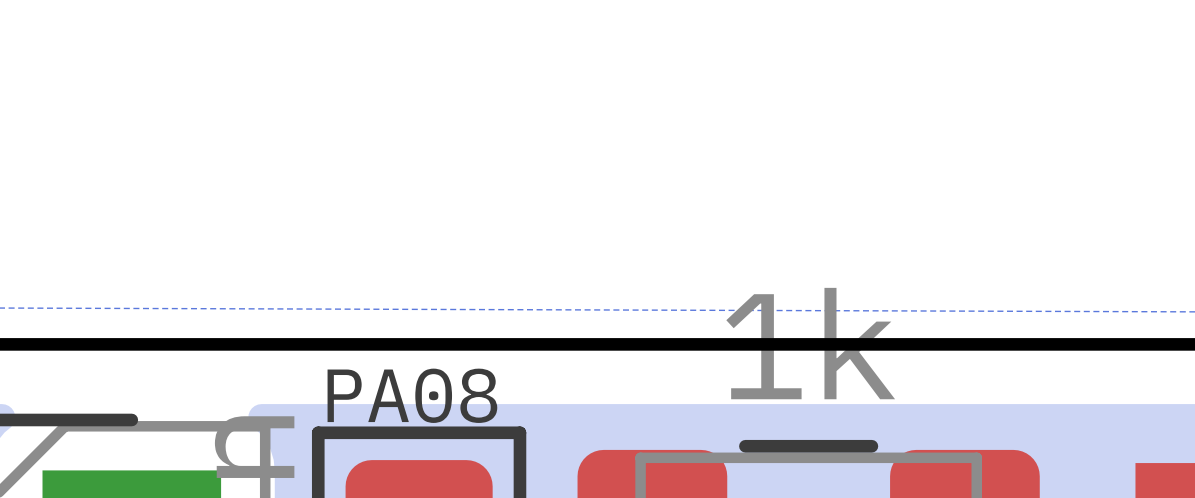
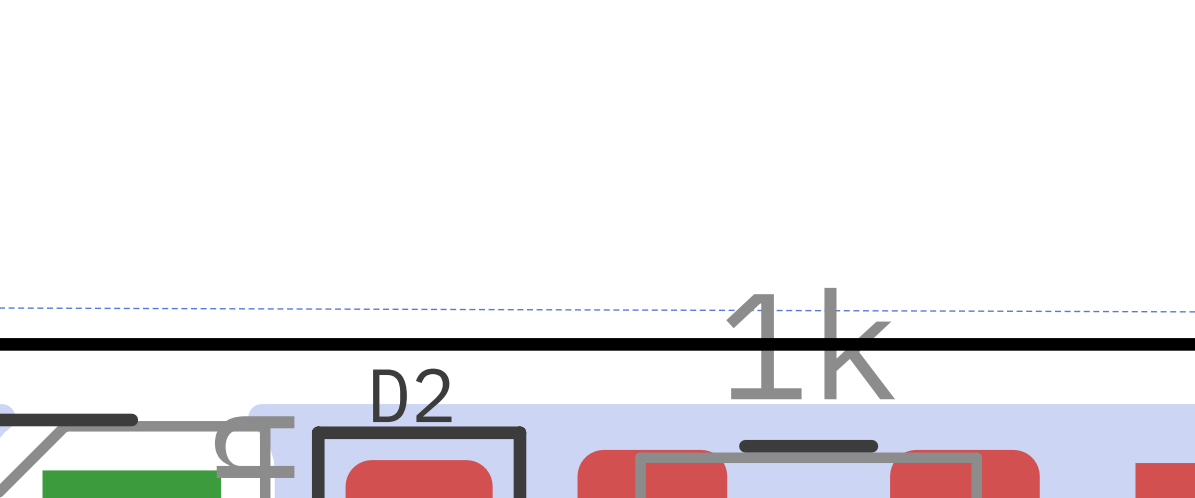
PA08 name: PA08 (412, 395) -> D2 (412, 395)

